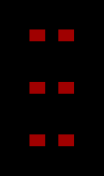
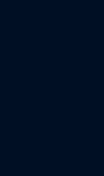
part: (51, 35) -> none
part: (51, 87) -> none
part: (51, 140) -> none

